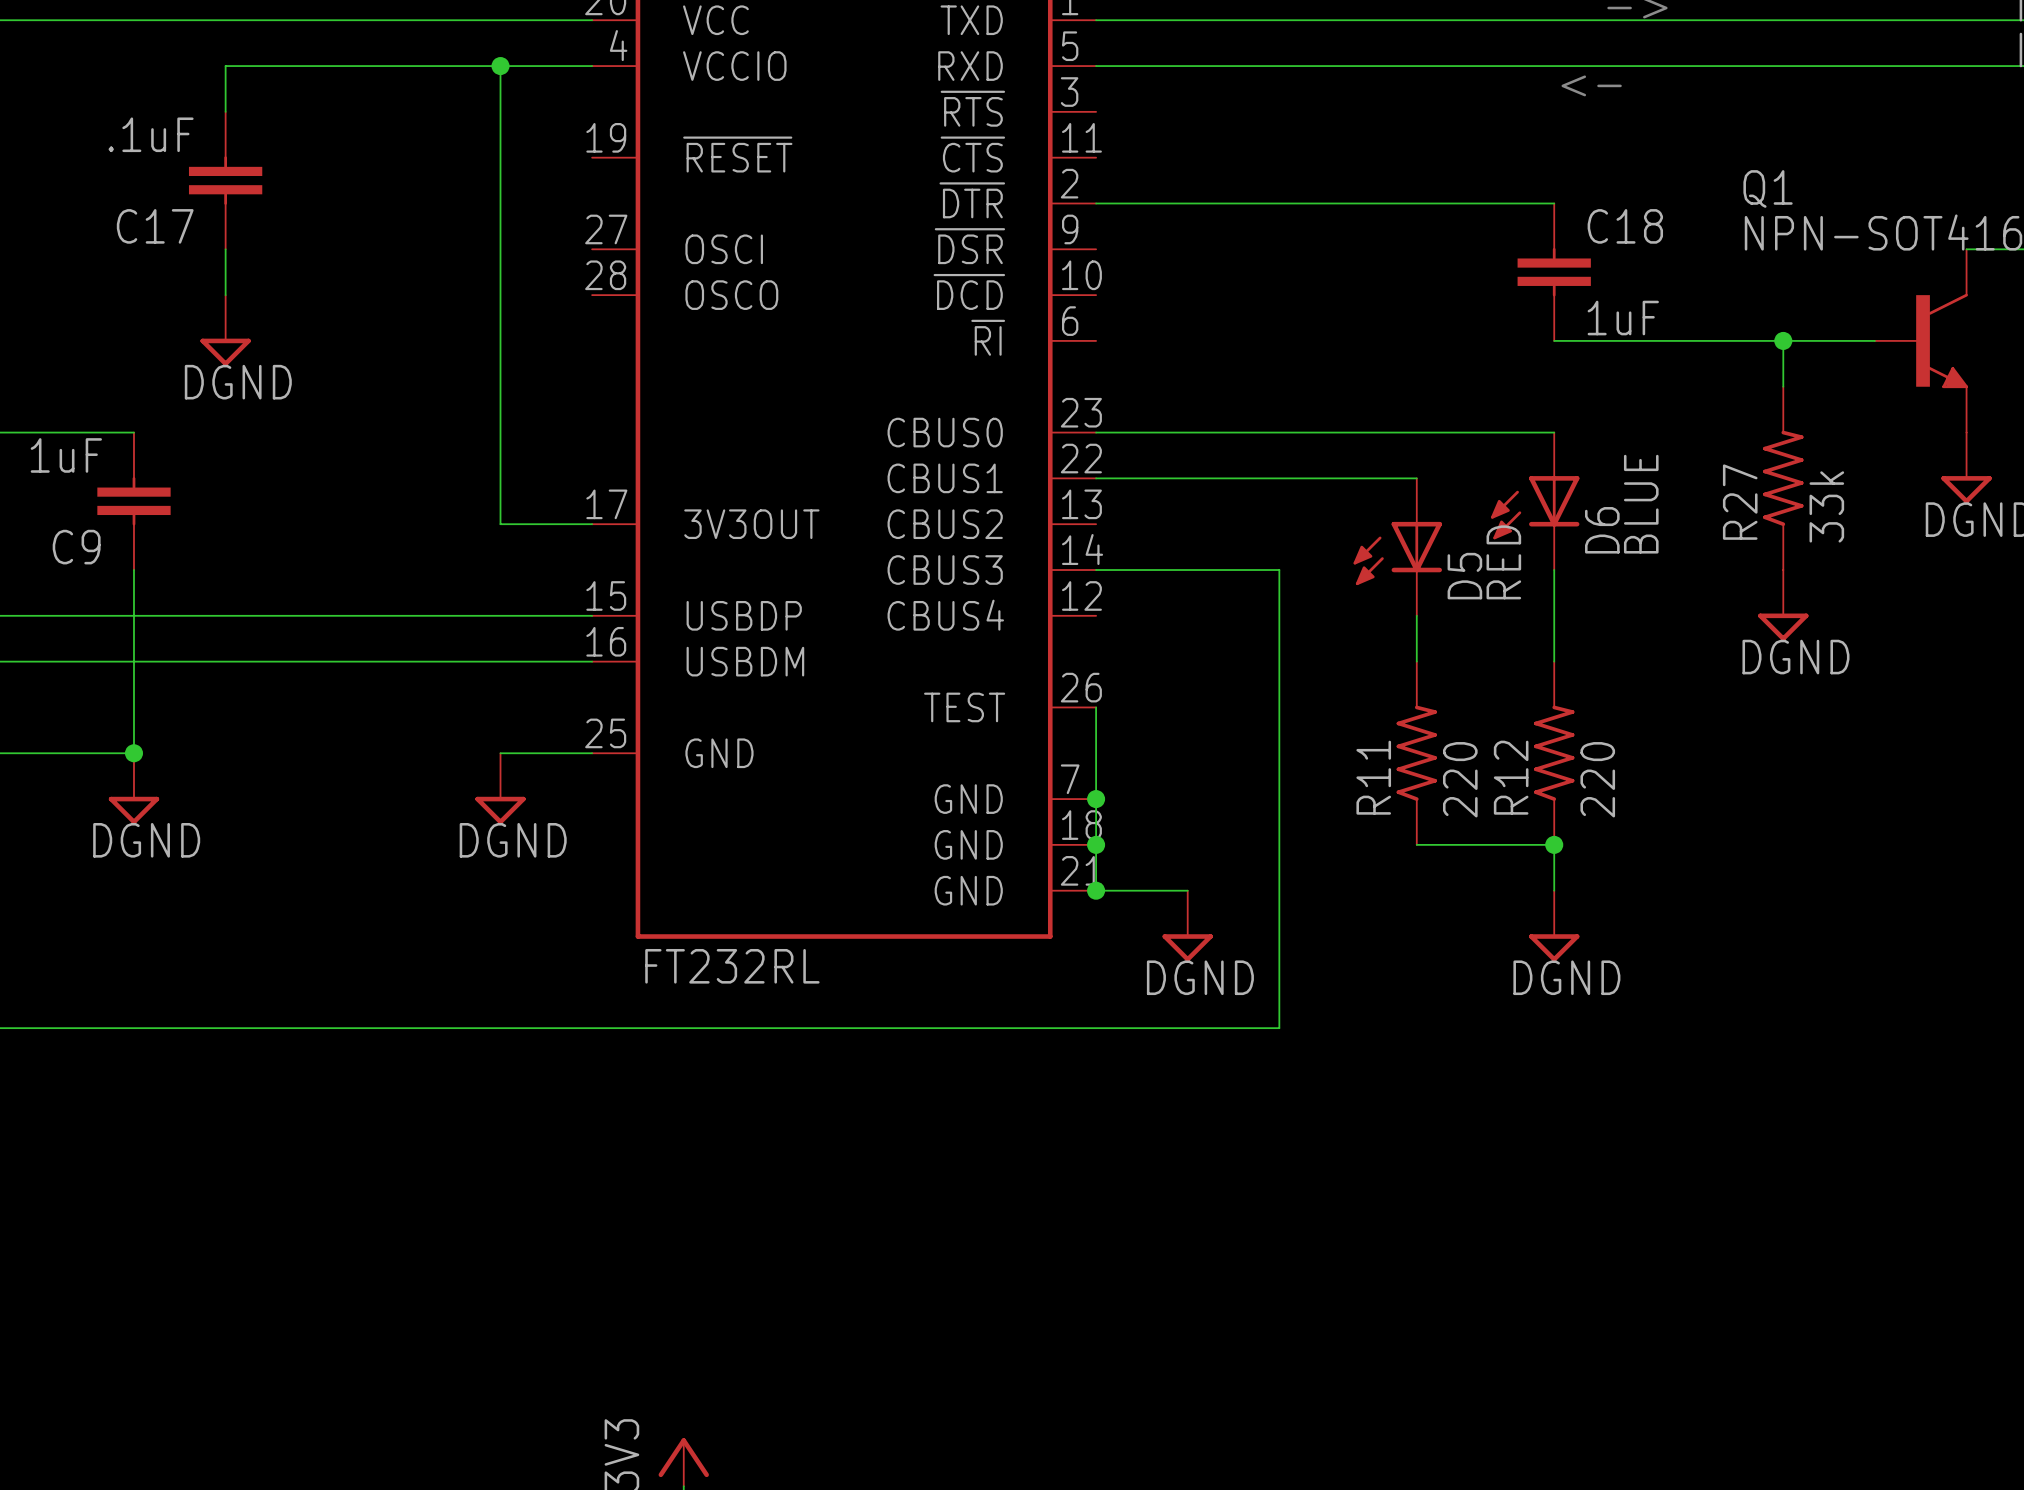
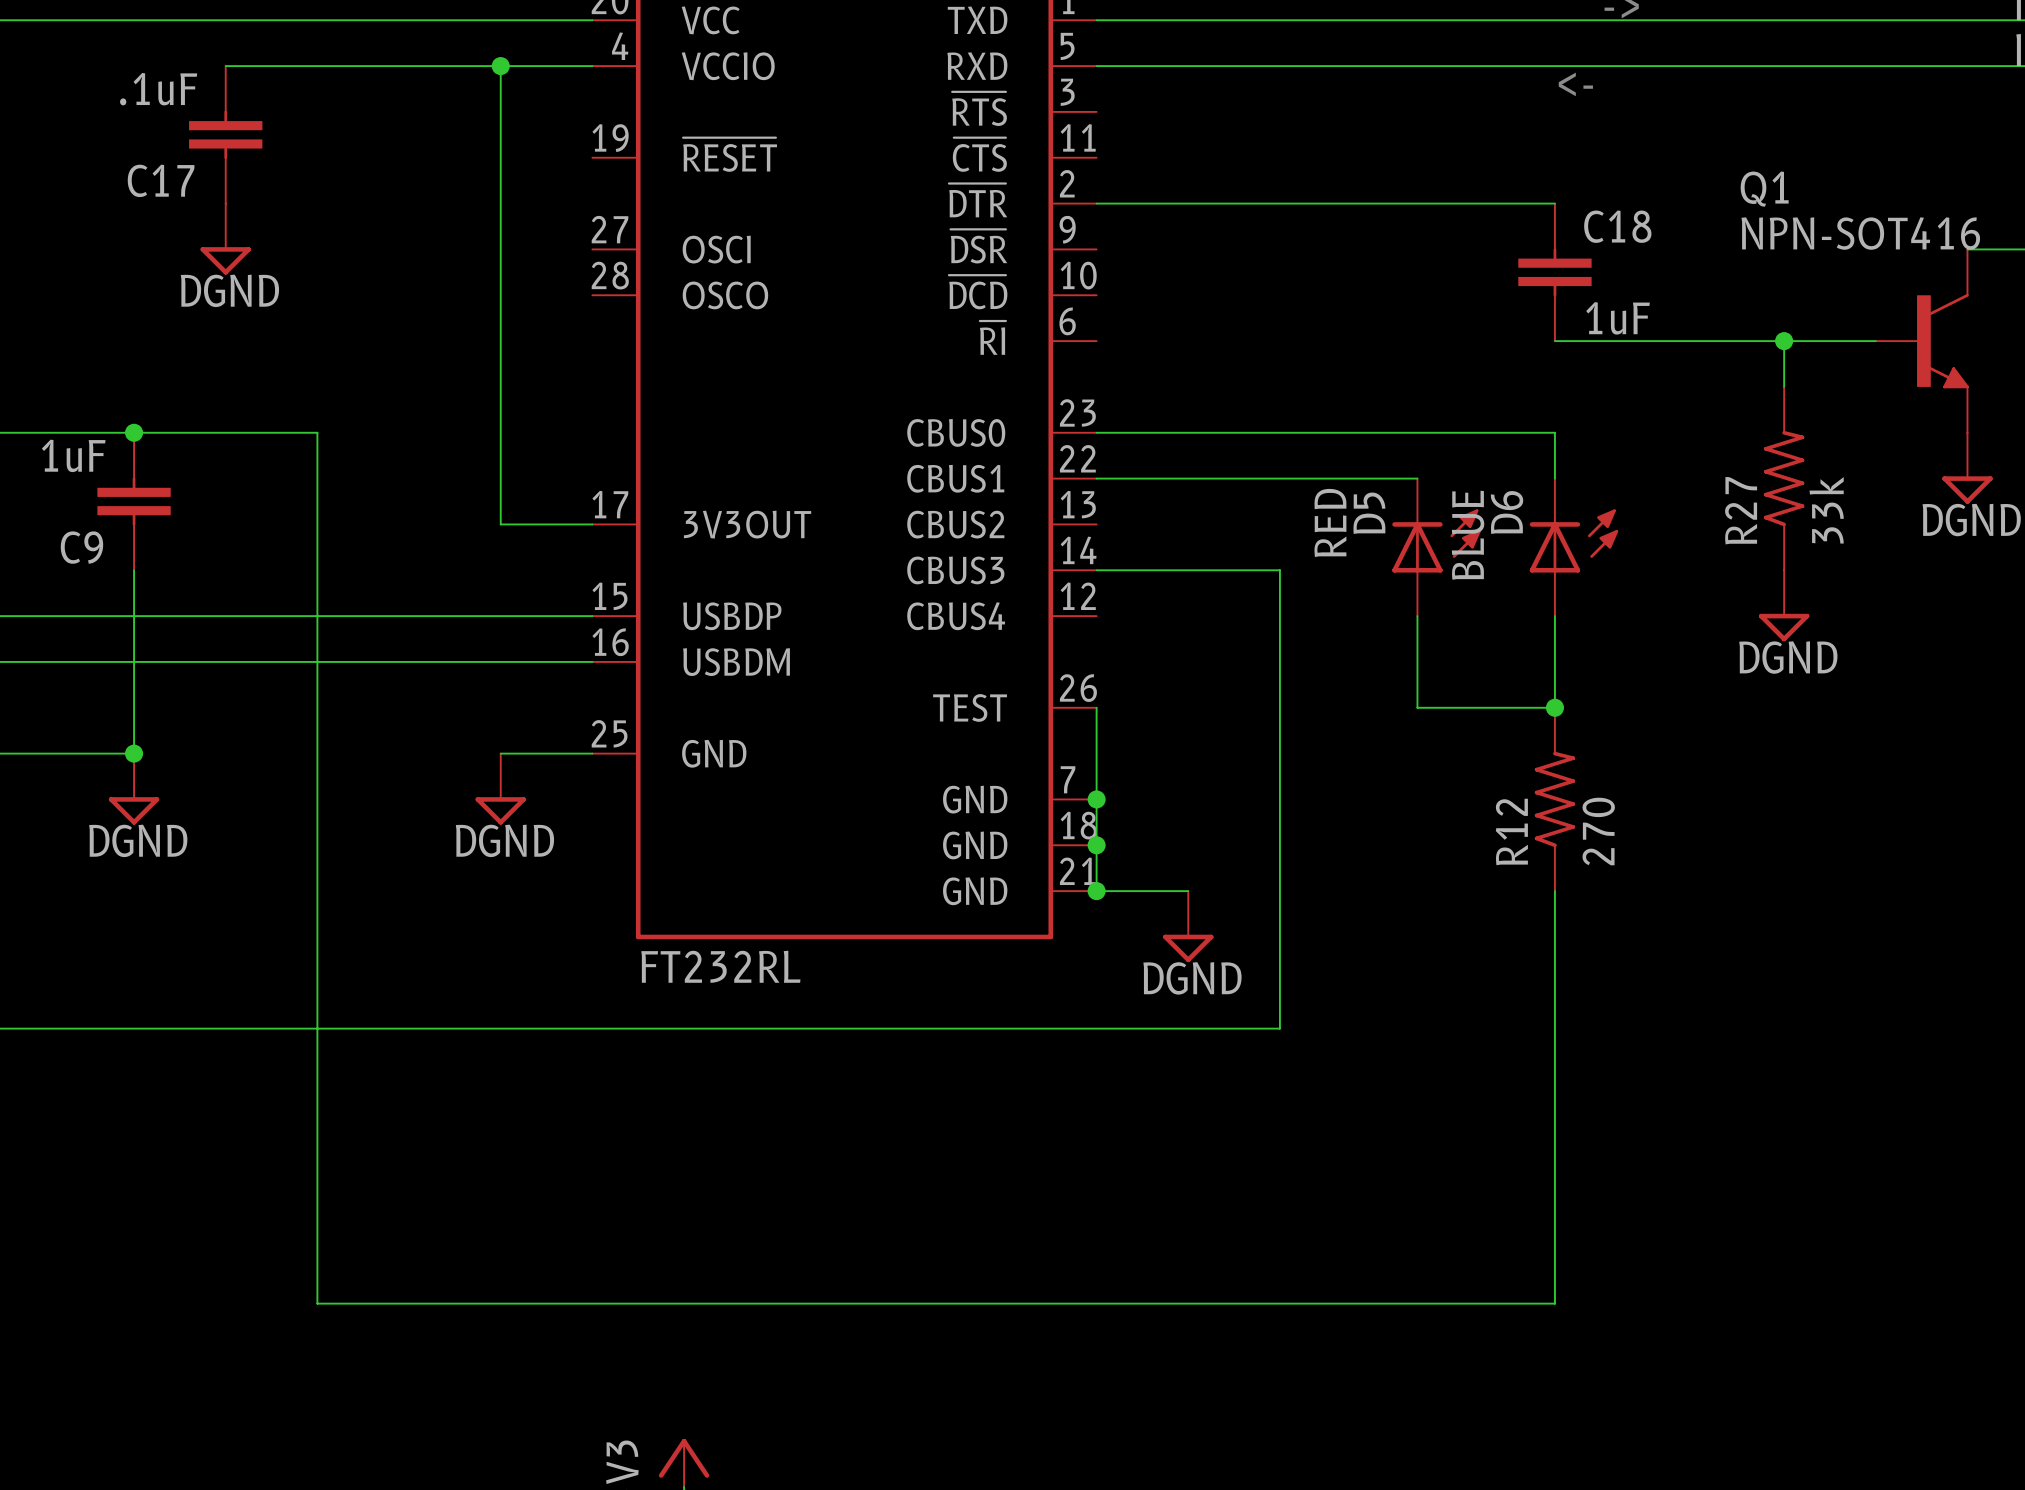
C17 position: (225, 180) -> (225, 134)
wire: (225, 249) (225, 295) -> none
power symbol position: DGND (225, 330) -> DGND (225, 239)
junction: none -> (134, 432)
D6 rotation: 0° (1535, 507) -> 180° (1573, 540)
D5 rotation: 0° (1397, 553) -> 180° (1436, 540)
wire: none -> (1417, 661) (1417, 707) (1554, 707) (1554, 661)
junction: none -> (1554, 707)
R11: 220 (1416, 753) -> none
R12 position: (1554, 753) -> (1554, 799)
R12 value: 220 (1597, 779) -> 270 (1598, 831)
wire: (1416, 844) (1554, 844) (1554, 890) -> (134, 432) (317, 432) (317, 1303) (1554, 1303) (1554, 891)
junction: (1554, 844) -> none
power symbol: DGND (1554, 926) -> none

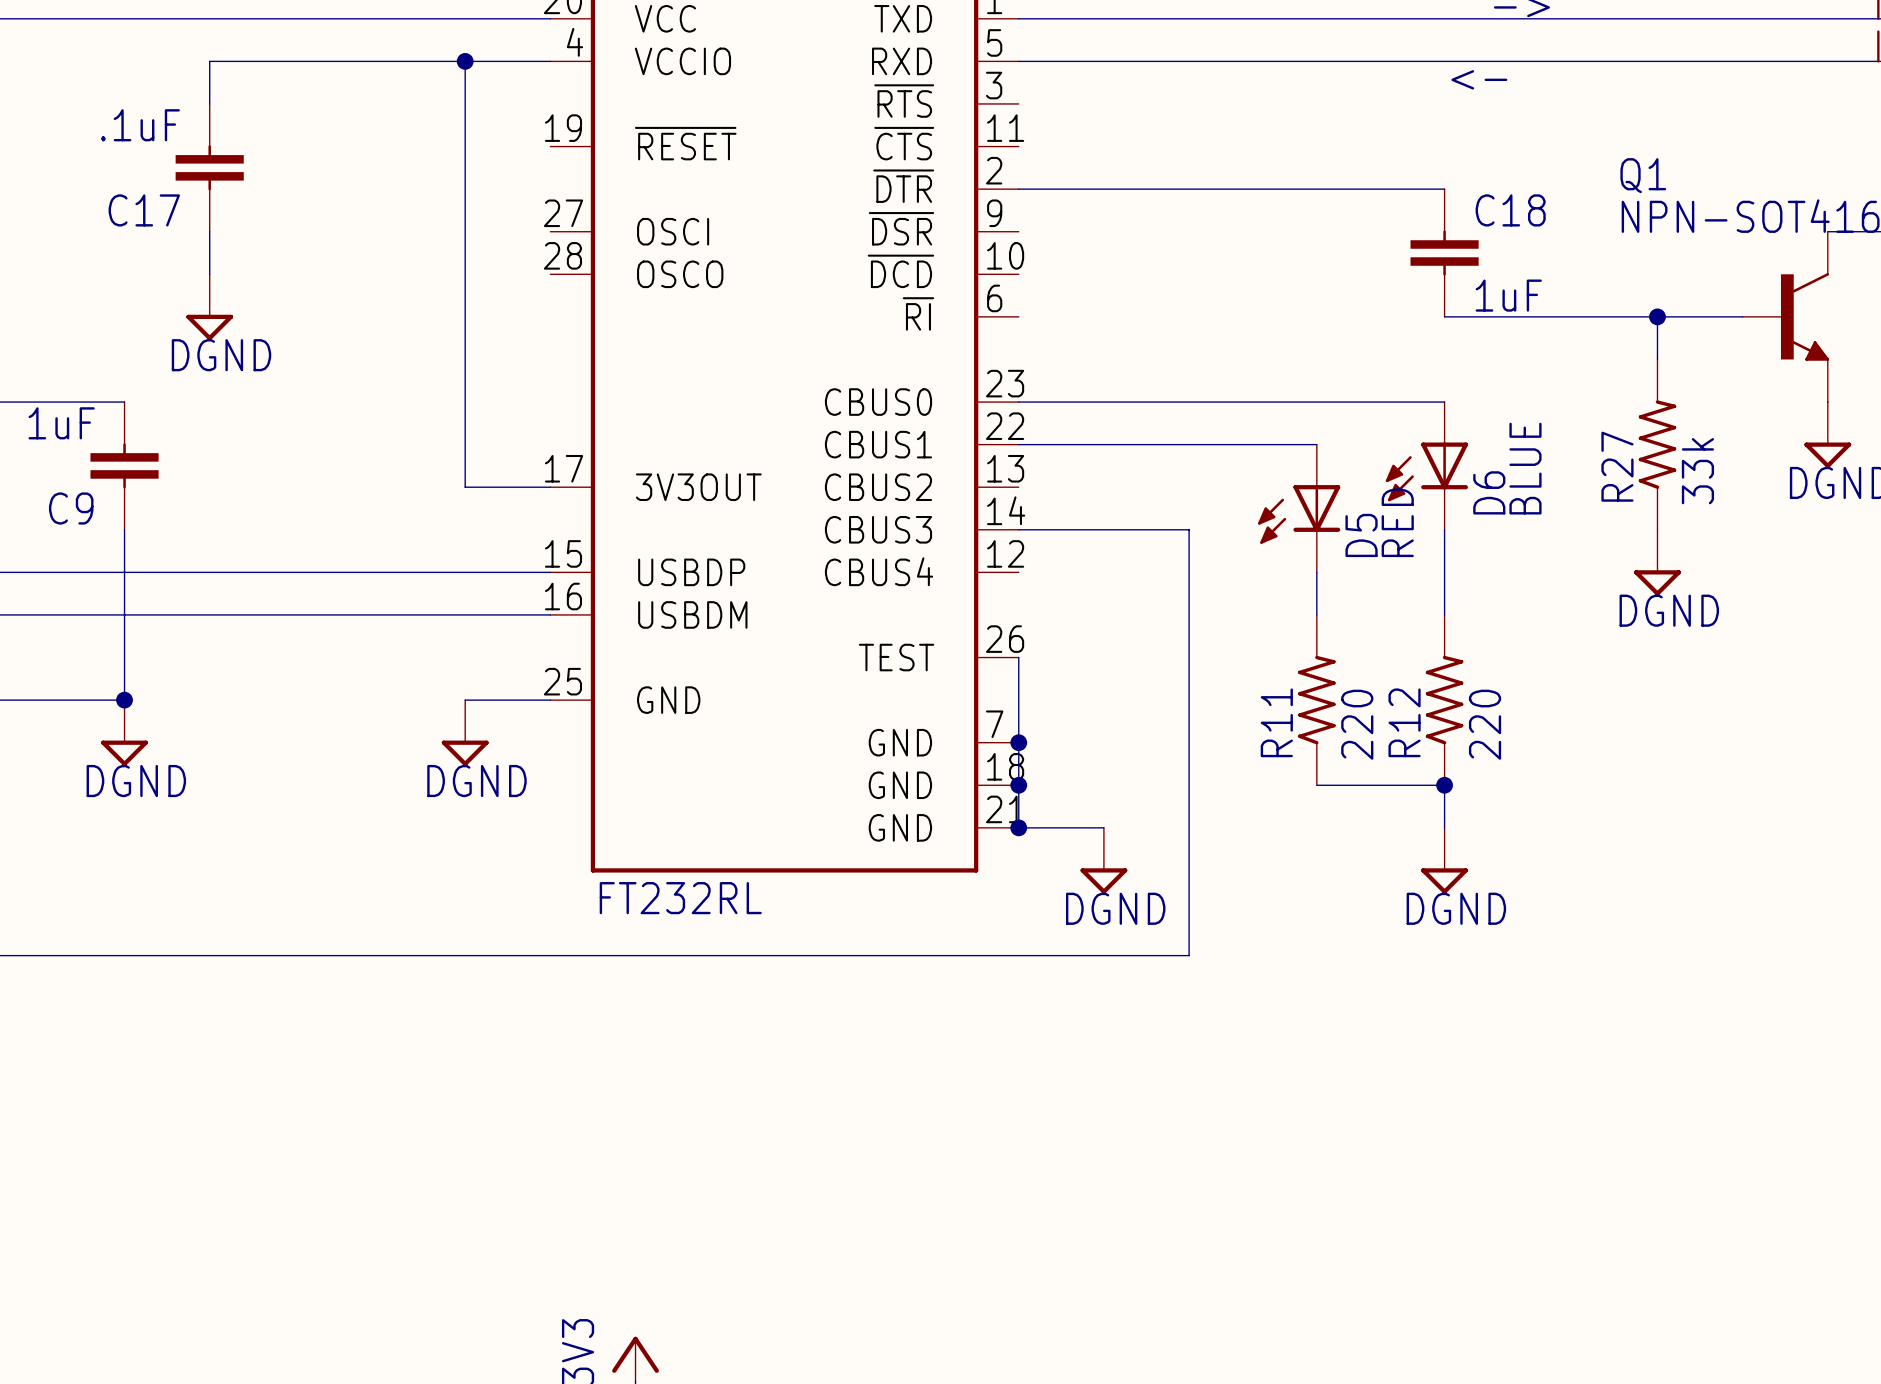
C17 position: (225, 134) -> (209, 167)
power symbol position: DGND (225, 239) -> DGND (209, 307)
wire: none -> (209, 231) (209, 274)
wire: (134, 432) (317, 432) (317, 1303) (1554, 1303) (1554, 891) -> (1316, 785) (1444, 785) (1444, 827)
junction: (134, 432) -> none
D5 rotation: 0° (1436, 540) -> 180° (1299, 514)
D6 rotation: 0° (1573, 540) -> 180° (1426, 471)
wire: (1417, 661) (1417, 707) (1554, 707) (1554, 661) -> none
junction: (1554, 707) -> none
R11: none -> 220 (1316, 700)
R12 position: (1554, 799) -> (1444, 700)
R12 value: 270 (1598, 831) -> 220 (1485, 724)
junction: none -> (1444, 785)
power symbol: none -> DGND (1444, 860)

